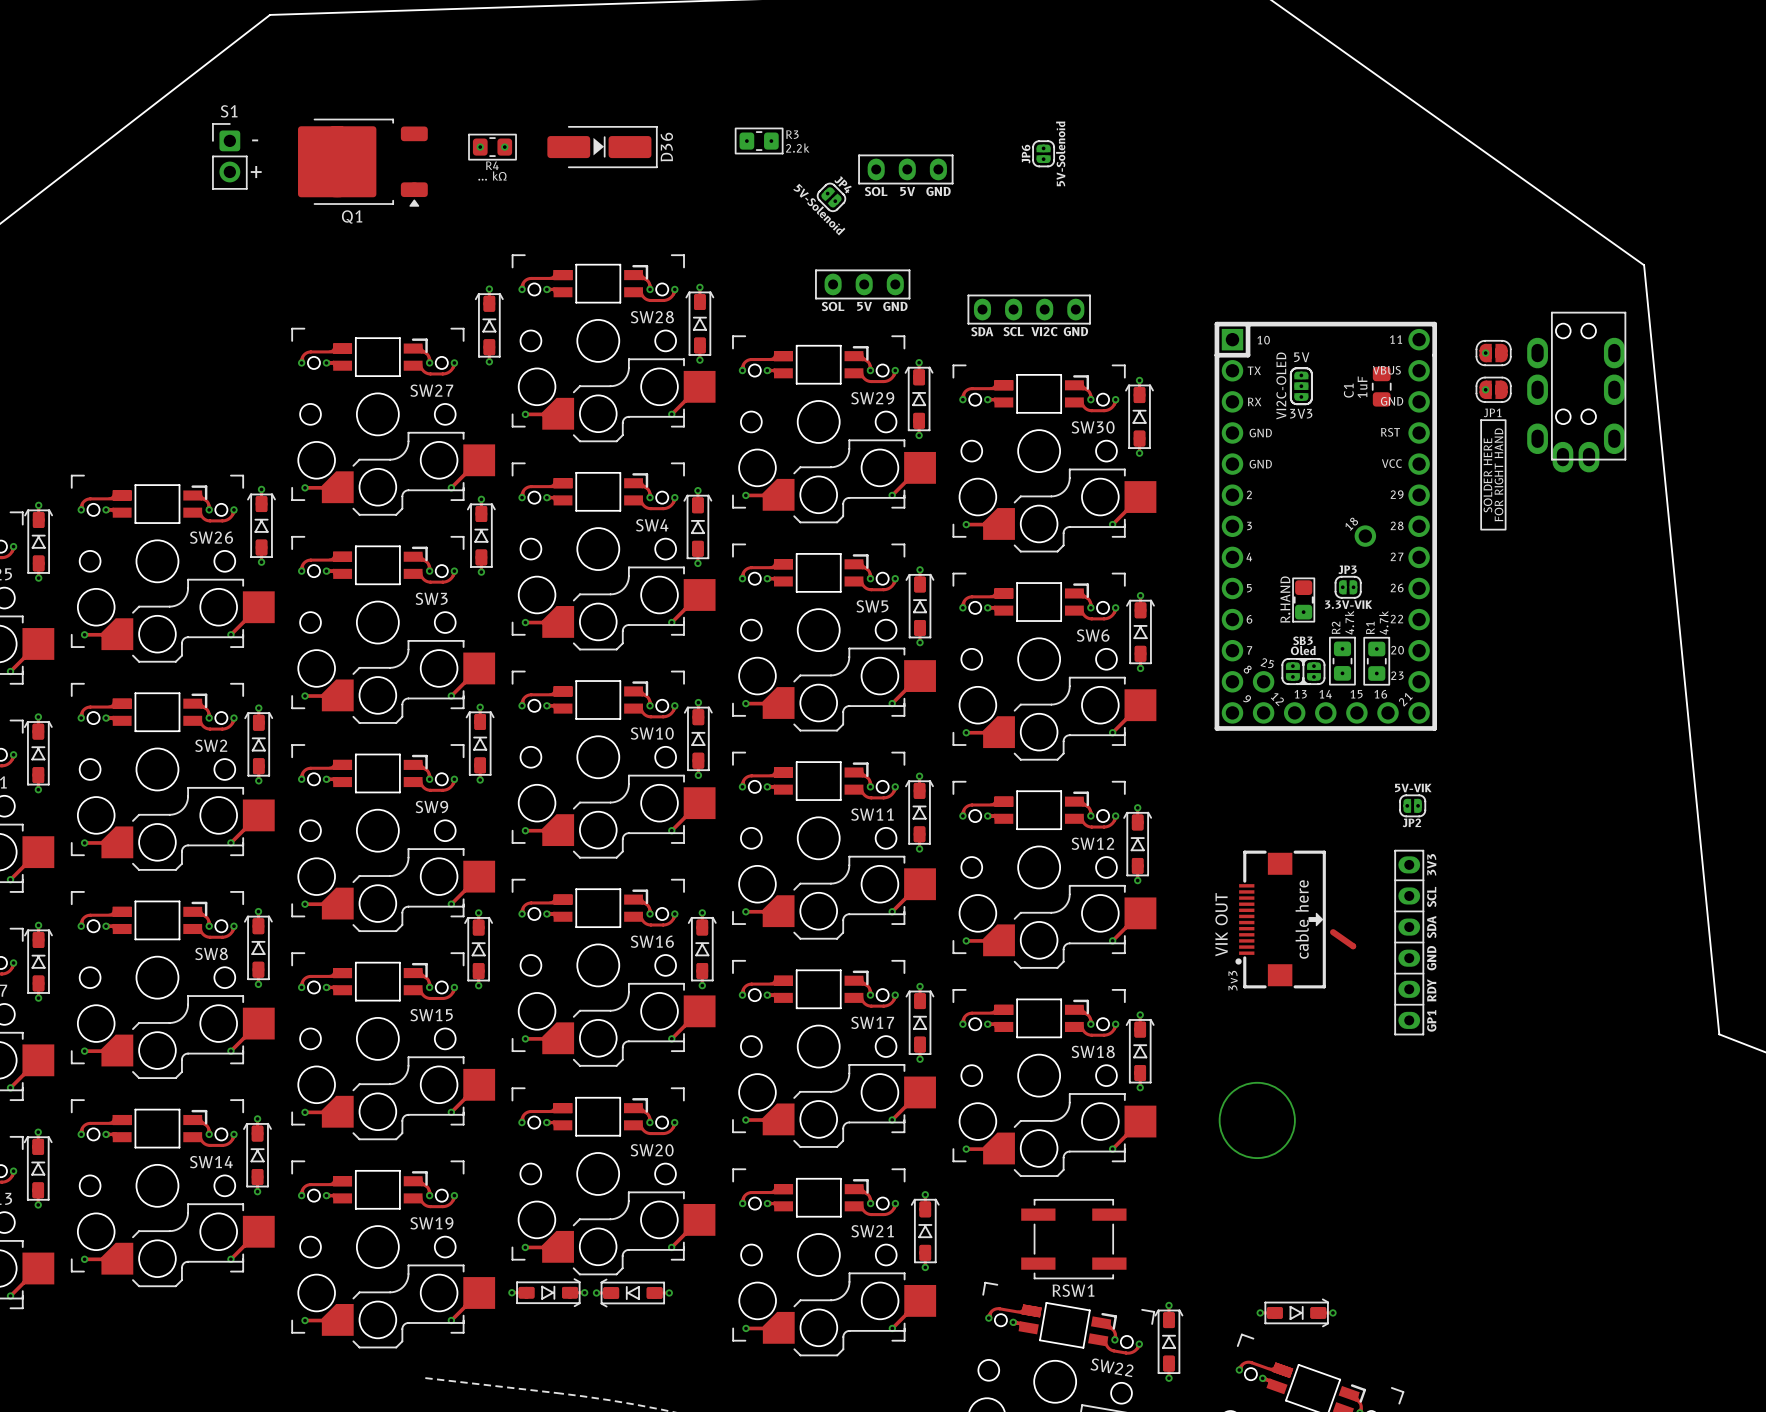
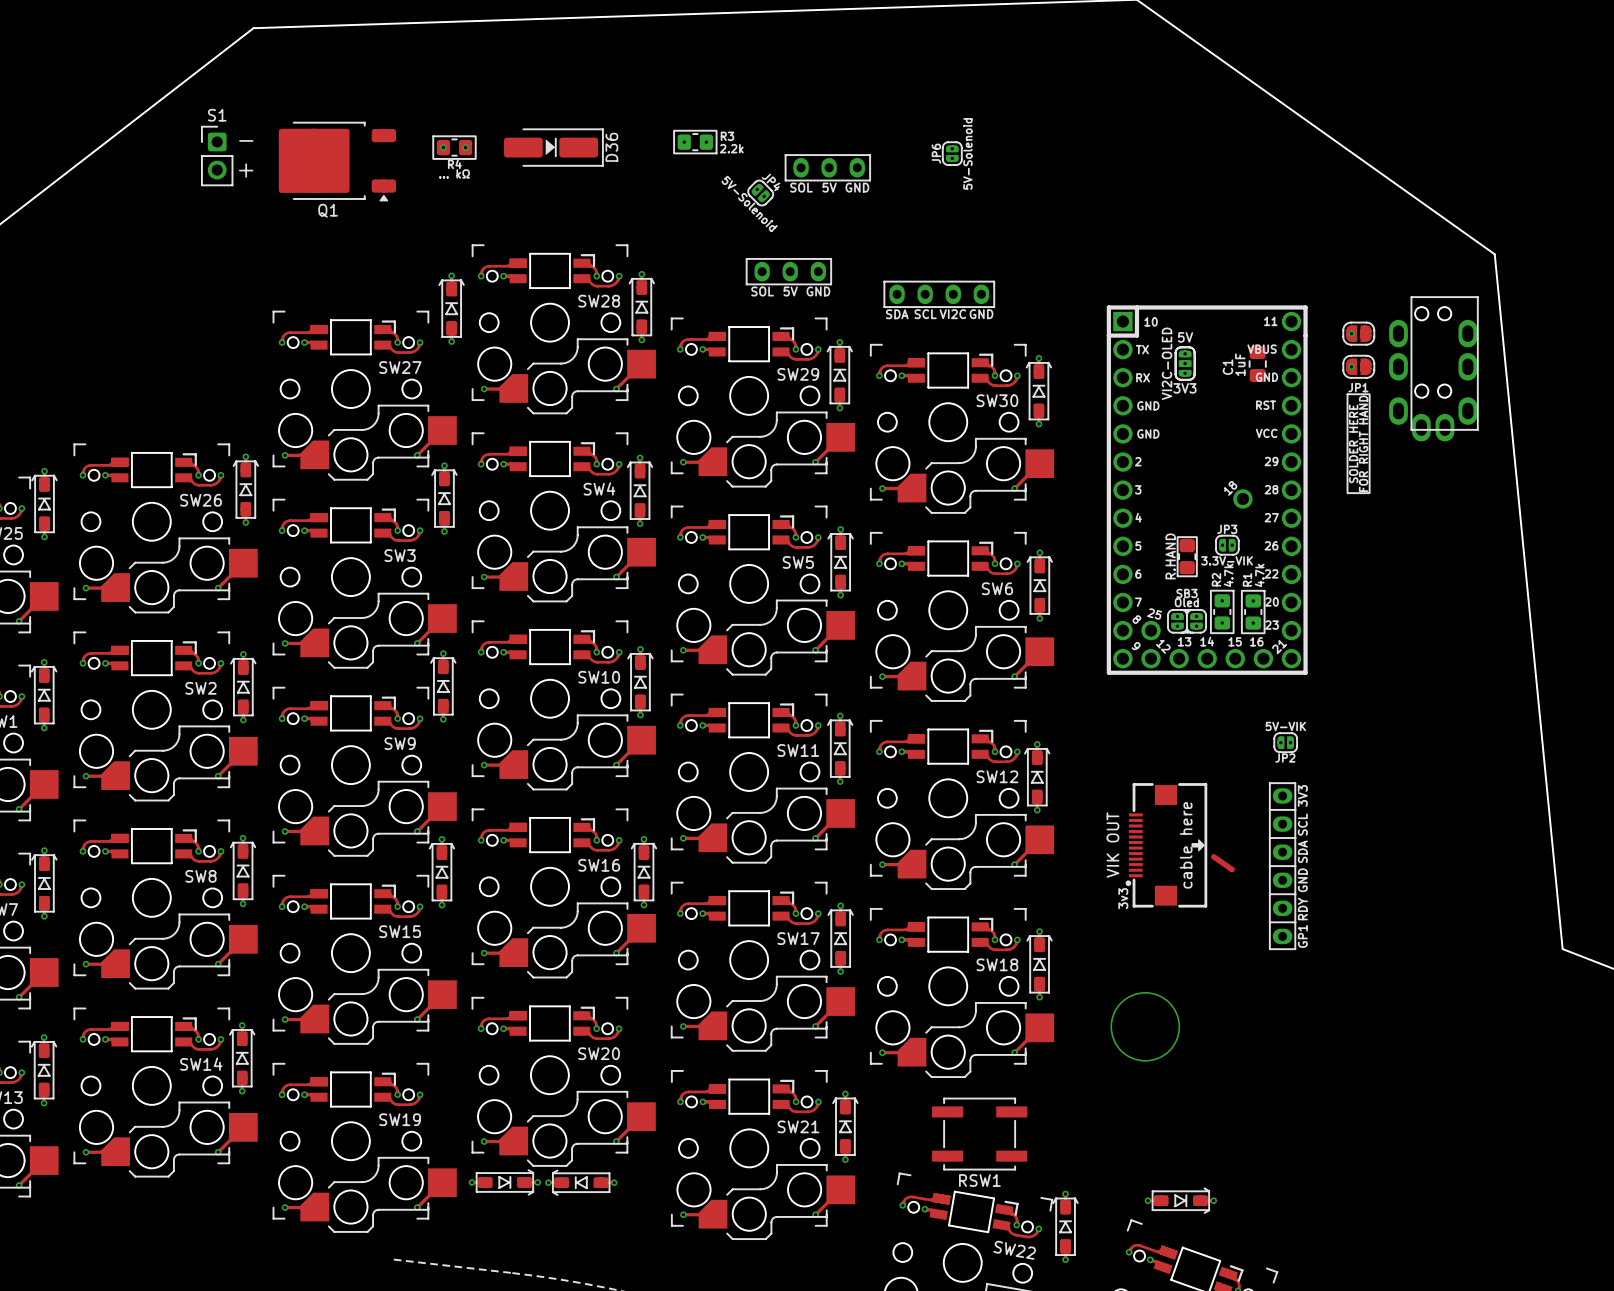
part footprint: [1292, 577, 1315, 623] -> [1177, 536, 1198, 577]

